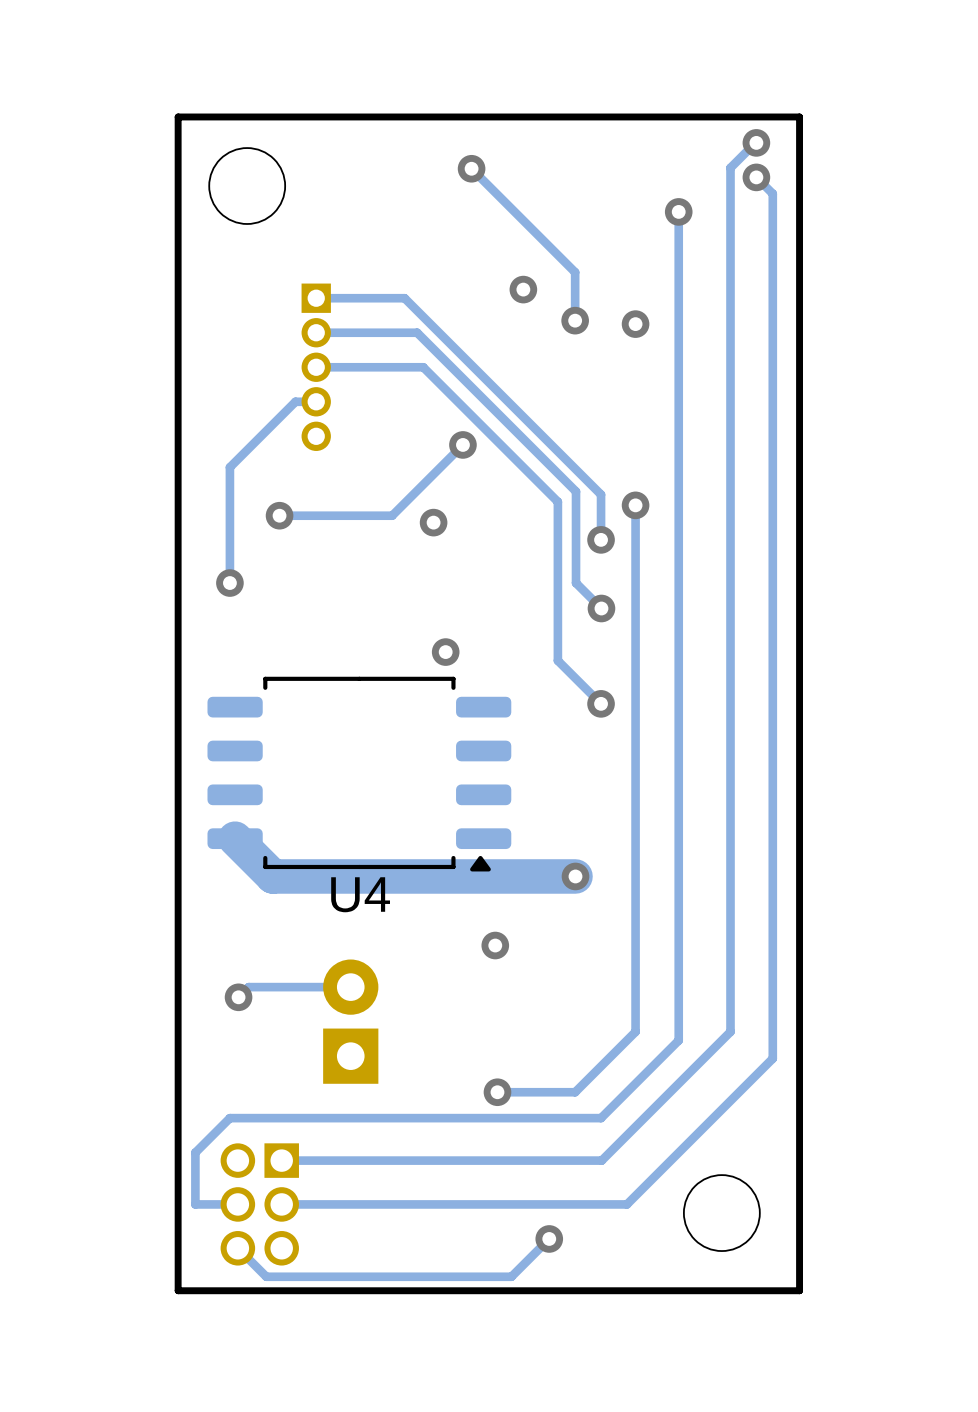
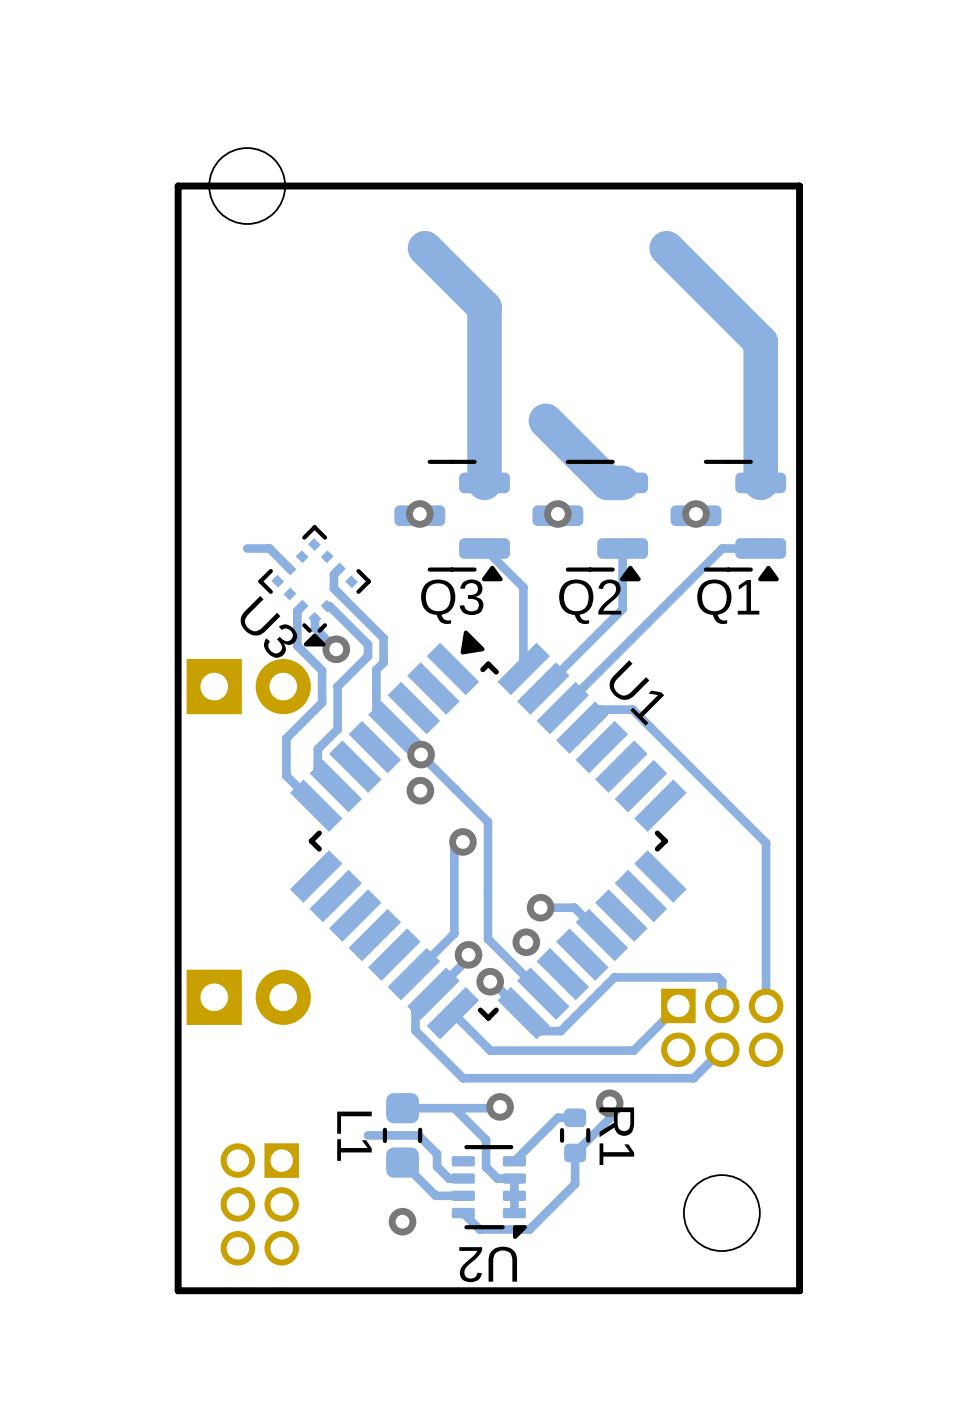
track: (756, 142) (730, 167) (730, 1031) (601, 1160) (281, 1160) -> none
via: (756, 142) -> none
track: (471, 168) (575, 272) (575, 320) -> none
via: (471, 168) -> none
track: (756, 177) (772, 193) (772, 1058) (626, 1204) (281, 1204) -> none
via: (756, 177) -> none
board edge: (799, 186) (799, 116) (178, 116) (178, 186) -> (799, 186) (178, 186)
track: (678, 211) (678, 1040) (601, 1118) (229, 1118) (195, 1152) (195, 1204) (237, 1204) -> none
via: (678, 211) -> none
track: none -> (424, 248) (484, 307) (484, 482)
track: none -> (666, 248) (760, 342) (760, 482)
via: (523, 289) -> none
track: (316, 298) (404, 298) (601, 494) (601, 539) -> none
via: (575, 320) -> none
via: (635, 324) -> none
track: (316, 332) (417, 332) (576, 491) (576, 583) (601, 608) -> none
track: (316, 367) (423, 367) (557, 501) (557, 660) (601, 703) -> none
part: (316, 367) -> none
track: (316, 401) (295, 401) (229, 467) (229, 583) -> none
track: none -> (545, 420) (607, 482) (622, 482)
track: (462, 444) (392, 515) (279, 515) -> none
via: (462, 444) -> none
track: (635, 505) (635, 1031) (575, 1092) (497, 1092) -> none
via: (635, 505) -> none
via: none -> (557, 513)
via: none -> (695, 513)
via: (279, 515) -> none
Q3: none -> (452, 520)
Q2: none -> (590, 520)
Q1: none -> (728, 520)
via position: (433, 522) -> (419, 513)
via: (601, 539) -> none
track: none -> (247, 548) (269, 548) (289, 568)
track: none -> (484, 548) (523, 587) (523, 669)
track: none -> (622, 548) (622, 609) (542, 688)
track: none -> (760, 548) (722, 548) (562, 708)
track: none -> (339, 568) (333, 574) (333, 588) (383, 638) (383, 662) (376, 669) (376, 709) (394, 727)
via: (229, 583) -> none
U3: none -> (314, 585)
track: none -> (302, 606) (297, 610) (297, 645) (322, 670) (322, 702) (286, 738) (286, 775) (316, 805)
track: none -> (327, 606) (329, 606) (368, 644) (368, 656) (337, 686) (337, 729) (317, 749) (317, 768) (335, 786)
via: (601, 608) -> none
track: none -> (314, 618) (314, 627) (336, 649)
via: none -> (336, 649)
via: (445, 652) -> none
part: none -> (248, 686)
via: (601, 703) -> none
track: none -> (393, 727) (487, 821) (487, 939) (542, 994)
track: none -> (582, 727) (600, 709) (632, 709) (766, 842) (766, 1005)
via: none -> (421, 754)
U4: (359, 774) -> none
via: none -> (420, 790)
U1: none -> (488, 834)
track: (235, 838) (272, 876) (575, 876) -> none
track: none -> (462, 841) (454, 850) (454, 933) (413, 974)
via: none -> (462, 841)
via: (575, 876) -> none
track: none -> (540, 907) (574, 907) (601, 935)
via: none -> (540, 907)
via: none -> (526, 942)
via position: (495, 945) -> (468, 954)
track: none -> (468, 954) (468, 958) (415, 1011) (415, 1030) (463, 1078) (693, 1078) (722, 1049)
track: none -> (490, 981) (541, 1031) (560, 1031) (614, 977) (718, 977) (722, 981) (722, 1005)
via: none -> (490, 981)
track: (350, 987) (248, 987) (238, 997) -> none
via: (238, 997) -> none
track: none -> (678, 1005) (633, 1050) (490, 1050) (452, 1013)
part rotation: 0° (350, 1021) -> 90° clockwise (248, 997)
part position: (350, 1021) -> (248, 997)
part: none -> (722, 1027)
via position: (497, 1092) -> (500, 1106)
track: none -> (609, 1103) (609, 1118) (575, 1153) (575, 1183) (529, 1229) (479, 1229) (463, 1213)
via: none -> (609, 1103)
track: none -> (500, 1106) (402, 1108)
track: none -> (454, 1108) (486, 1139) (486, 1167) (497, 1178) (514, 1178) (514, 1213)
track: none -> (575, 1117) (557, 1117) (514, 1161)
track: none -> (368, 1135) (418, 1135) (437, 1153) (437, 1166) (448, 1178) (463, 1178)
L1: none -> (402, 1135)
R1: none -> (575, 1135)
track: none -> (402, 1162) (435, 1195) (463, 1195)
U2: none -> (489, 1192)
via: none -> (402, 1221)
track: (549, 1238) (511, 1276) (266, 1276) (237, 1248) -> none
via: (549, 1238) -> none

